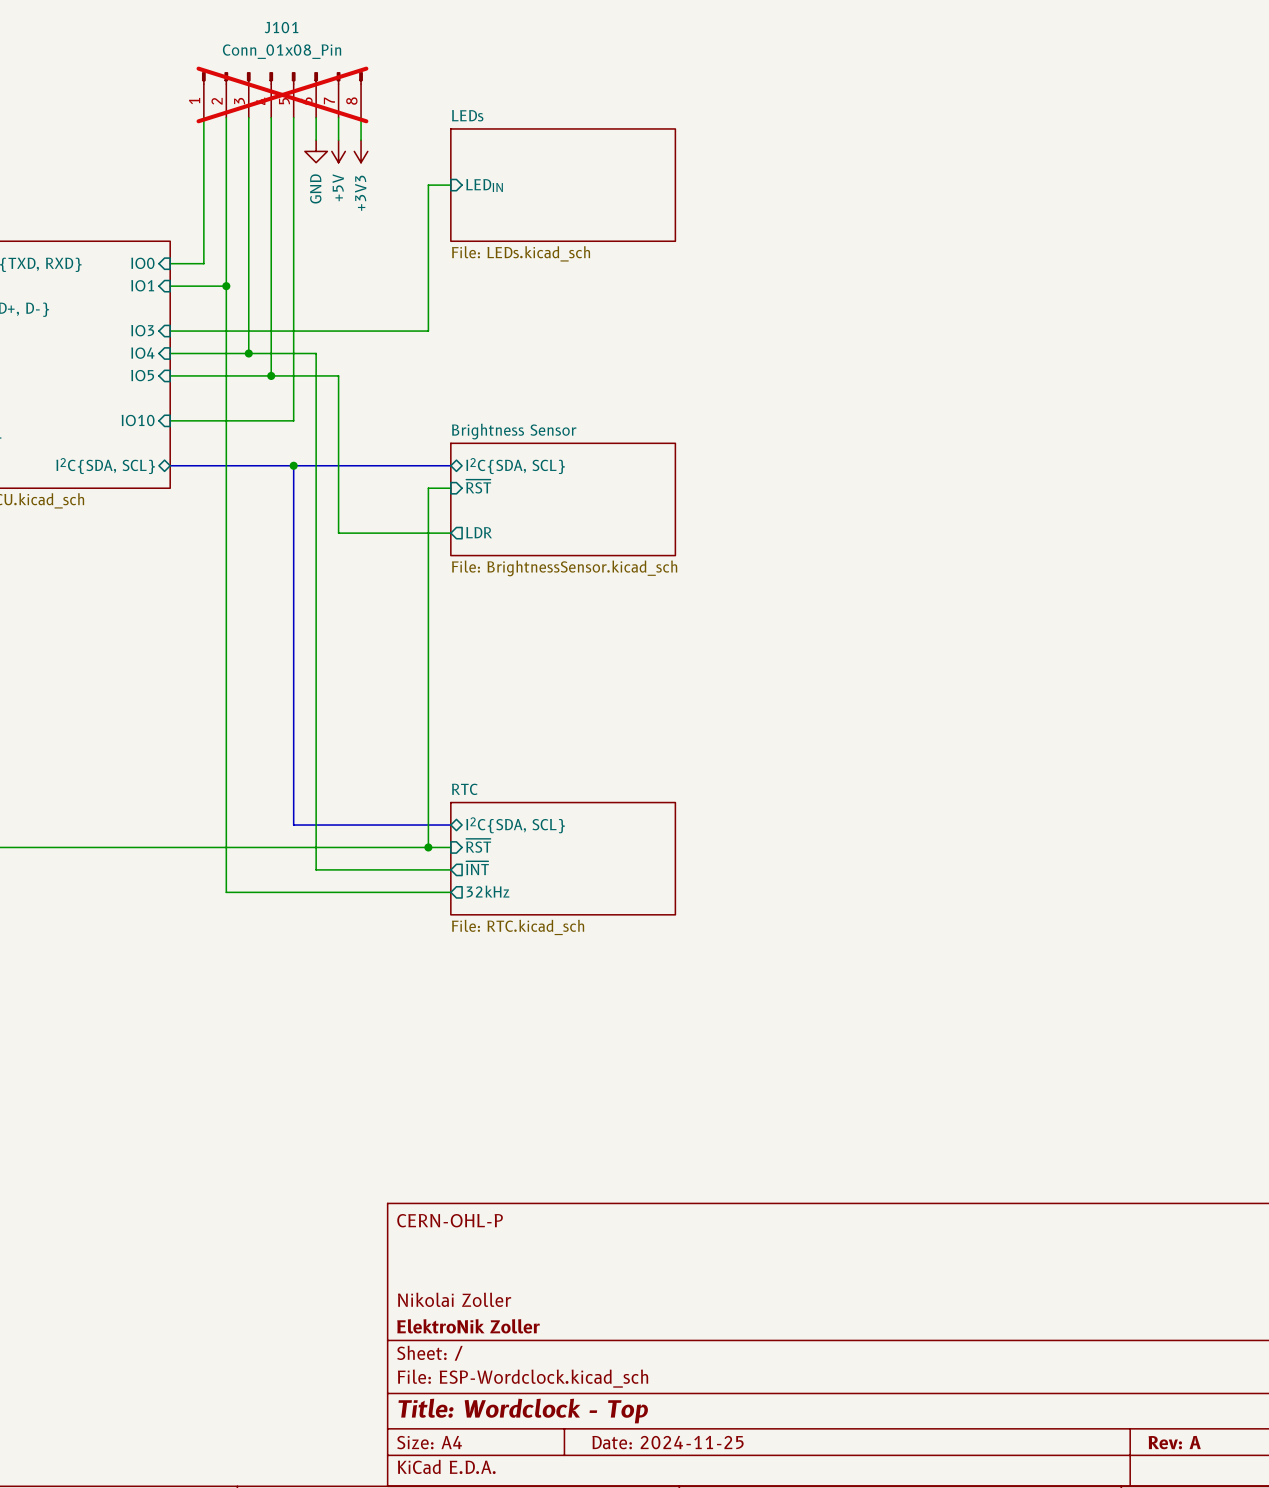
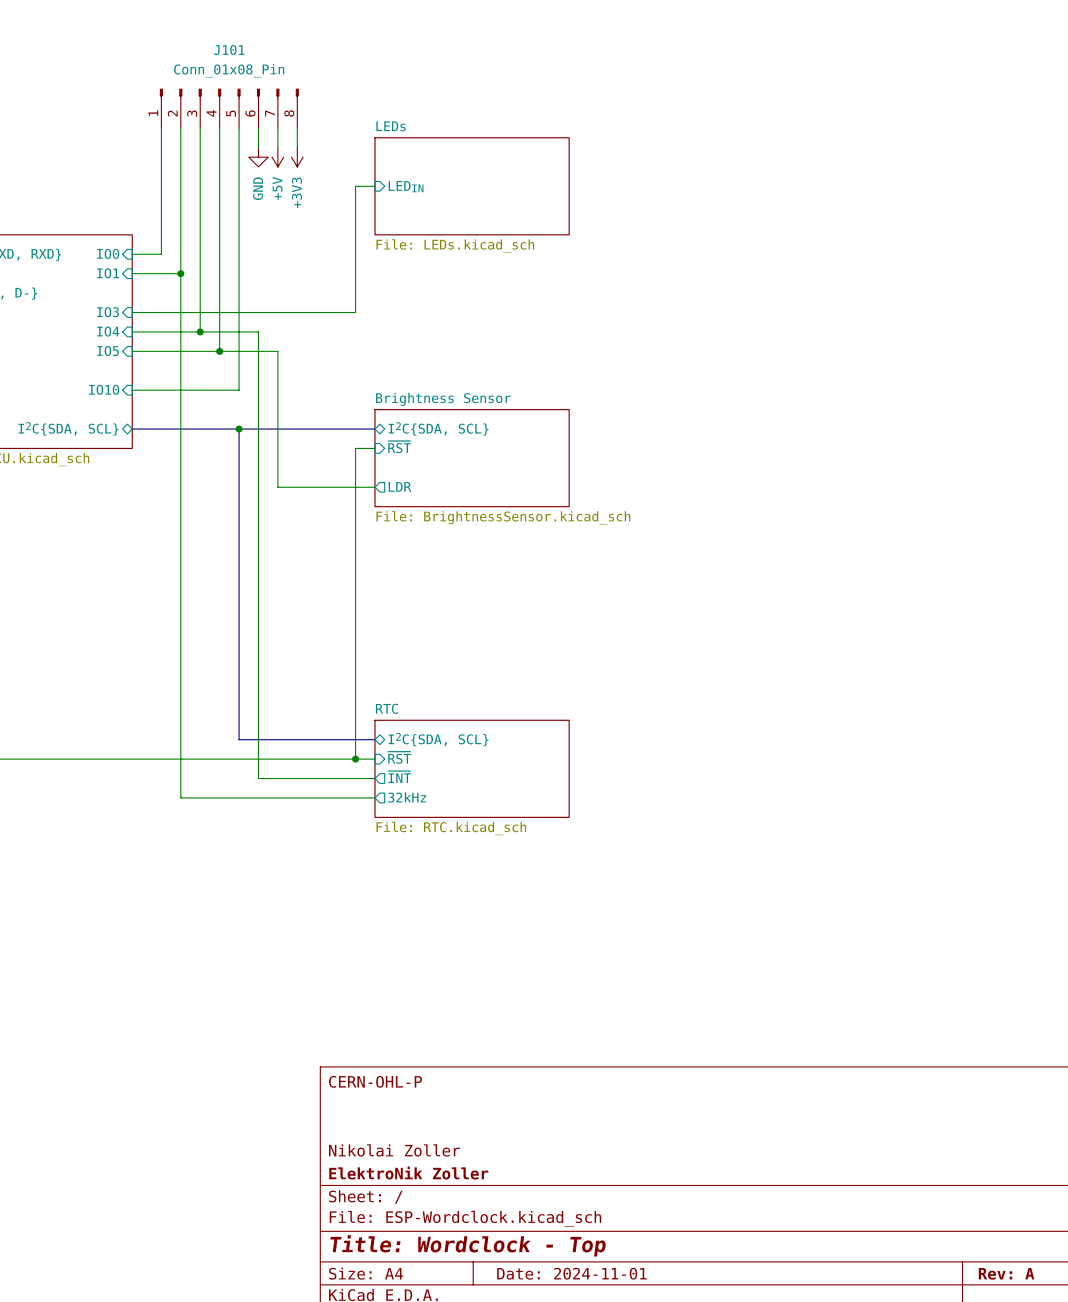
J101 do-not-place cross: (282, 94) -> none
title block: Date: 2024-11-25 (668, 1442) -> Date: 2024-11-01 (571, 1273)

